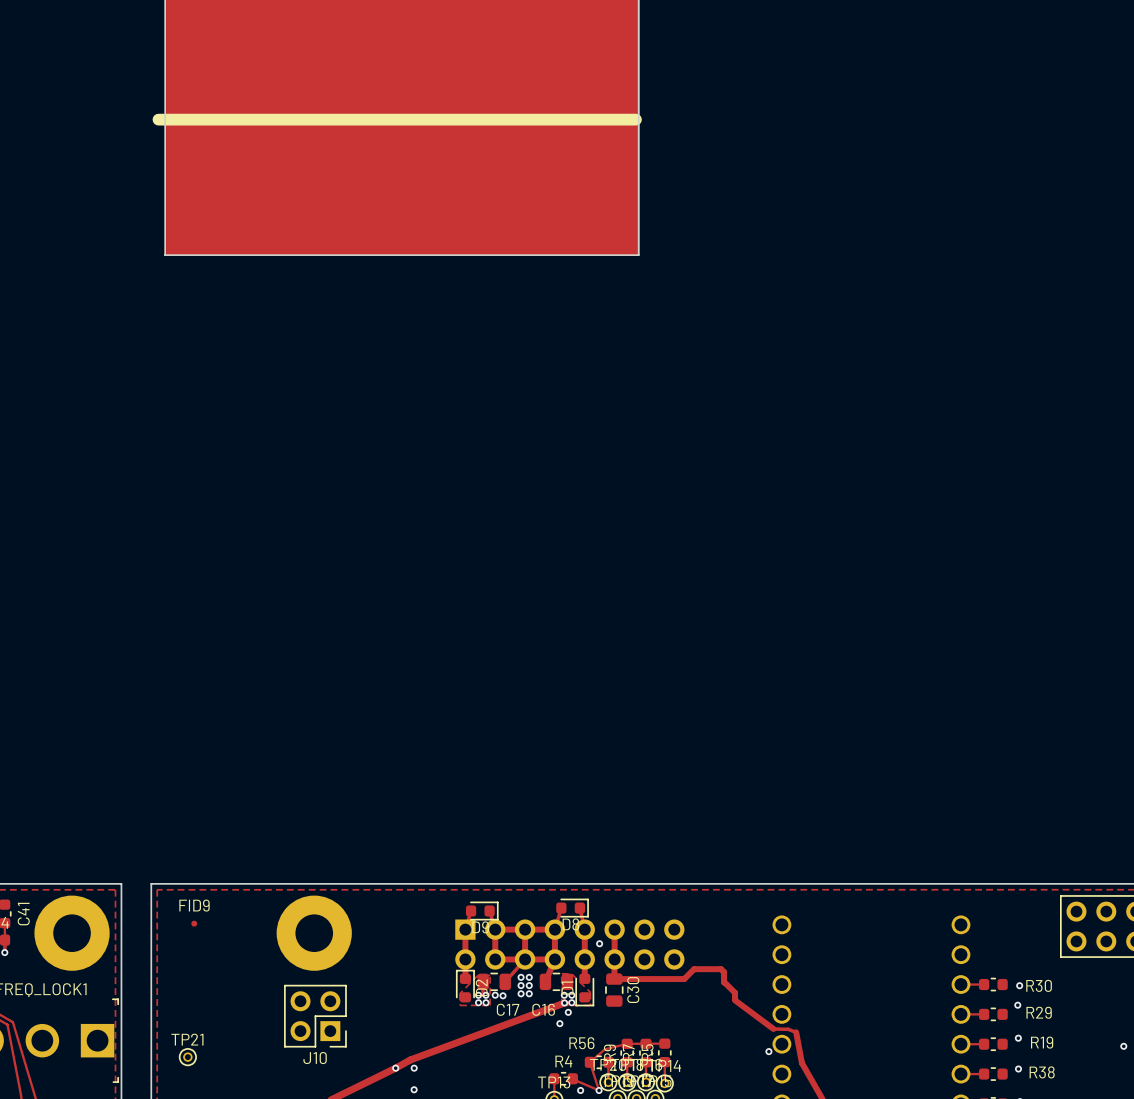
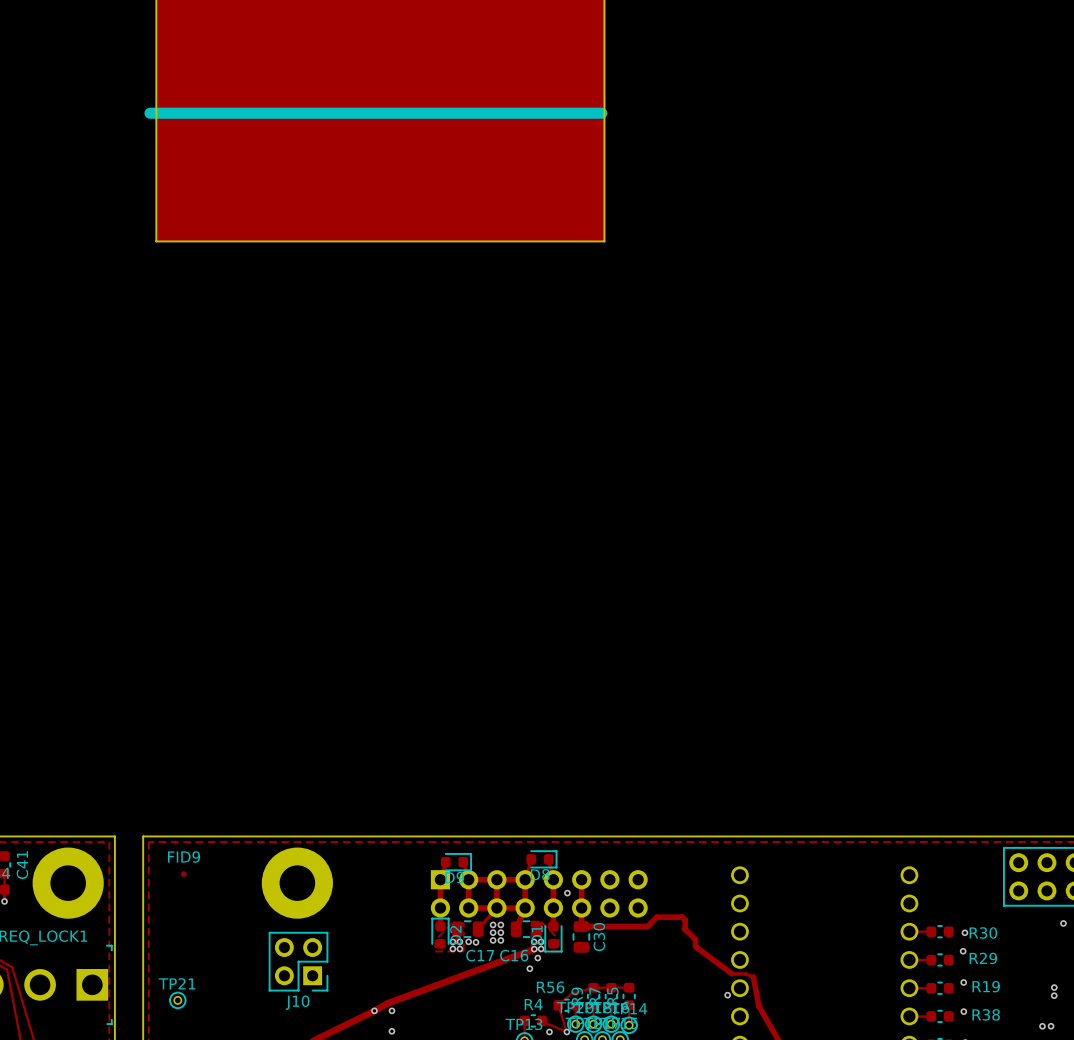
via: none -> (1063, 923)
via: none -> (1054, 987)
via: (1123, 1046) -> none
via: none -> (1054, 995)
via: none -> (1042, 1026)
via: none -> (1051, 1026)

